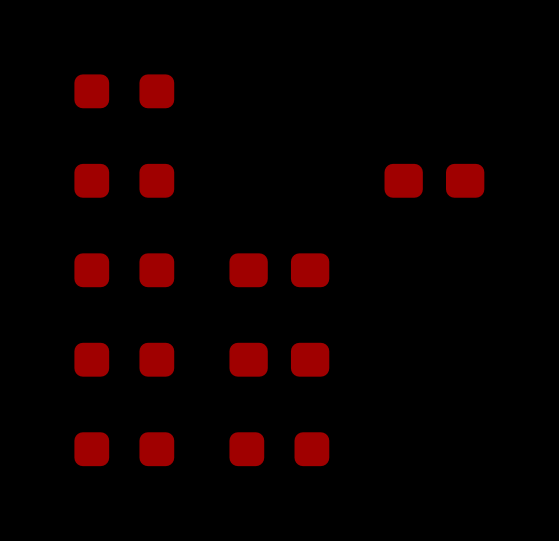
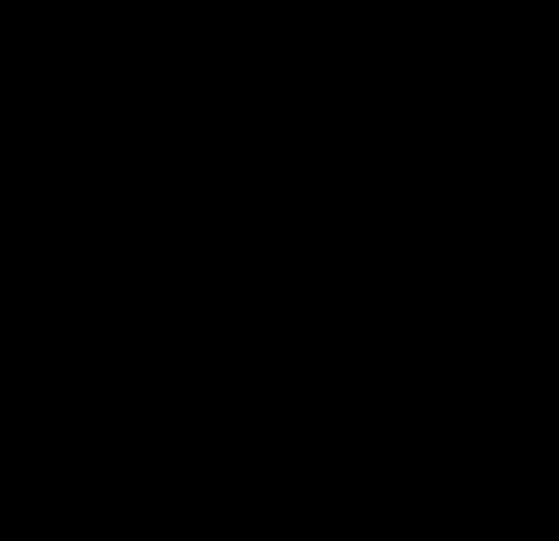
part: (124, 91) -> none
part: (124, 180) -> none
part: (434, 180) -> none
part: (124, 270) -> none
part: (279, 270) -> none
part: (124, 359) -> none
part: (279, 359) -> none
part: (124, 449) -> none
part: (279, 449) -> none

